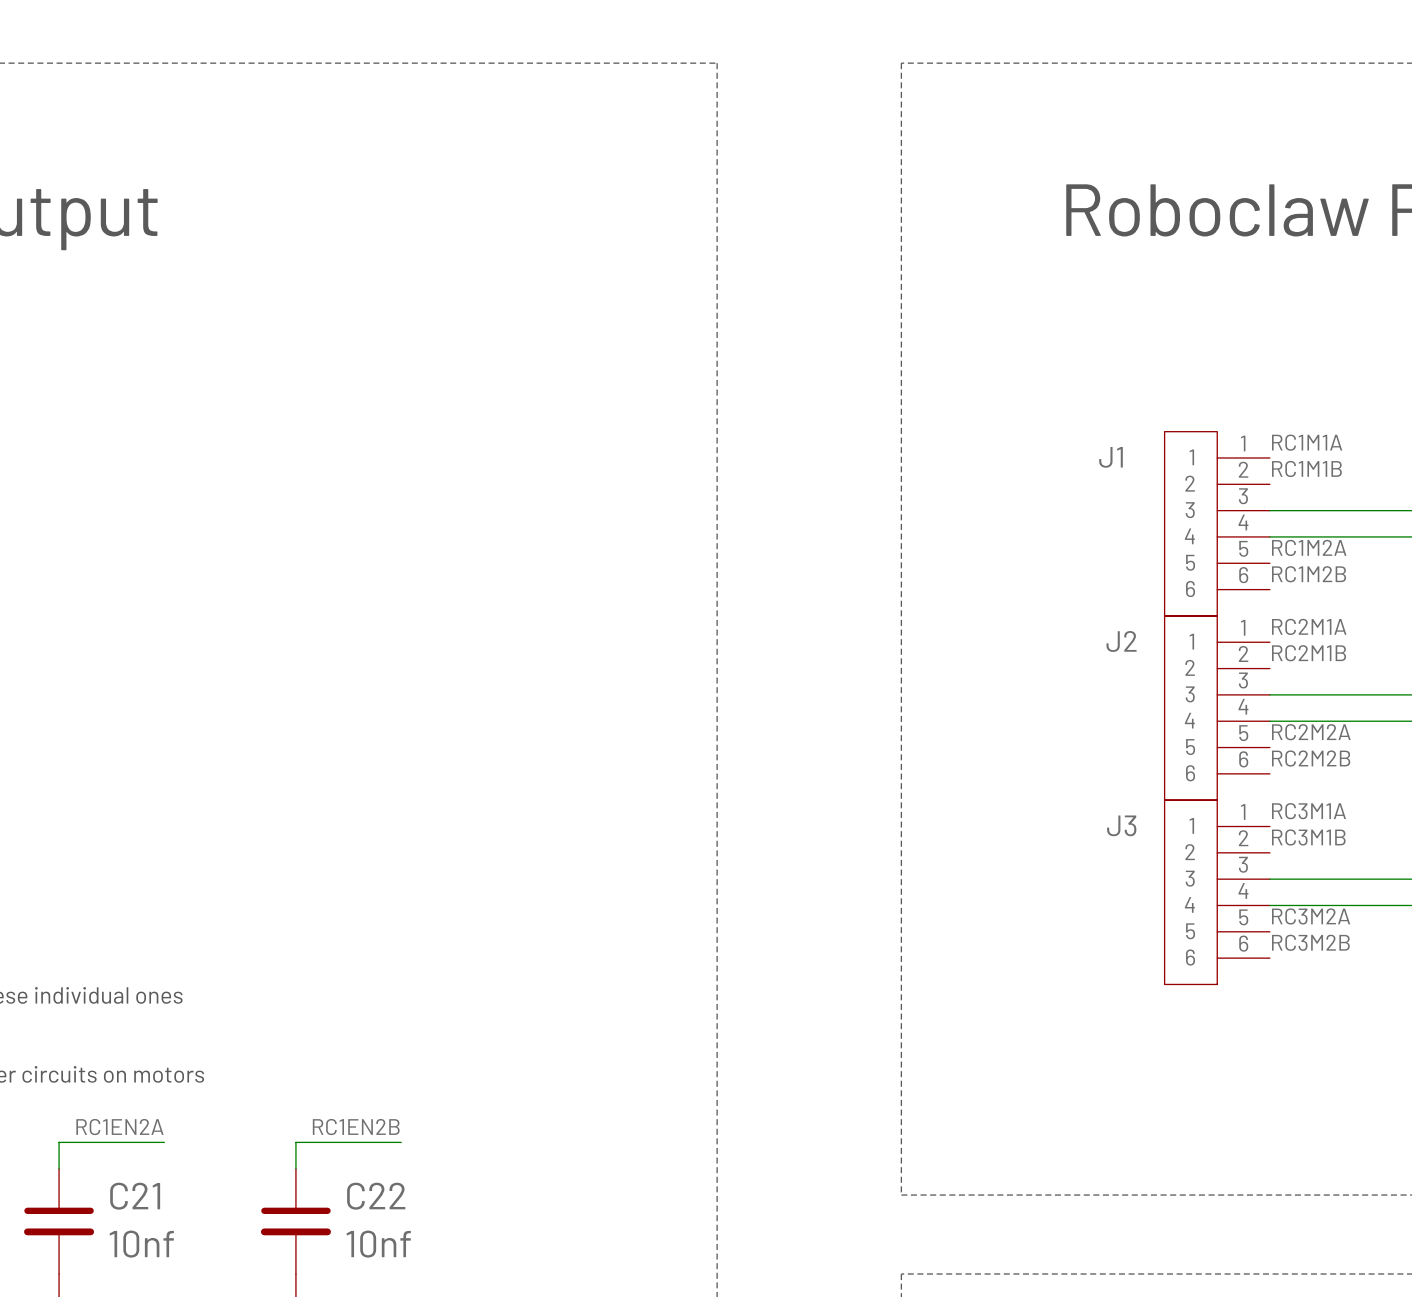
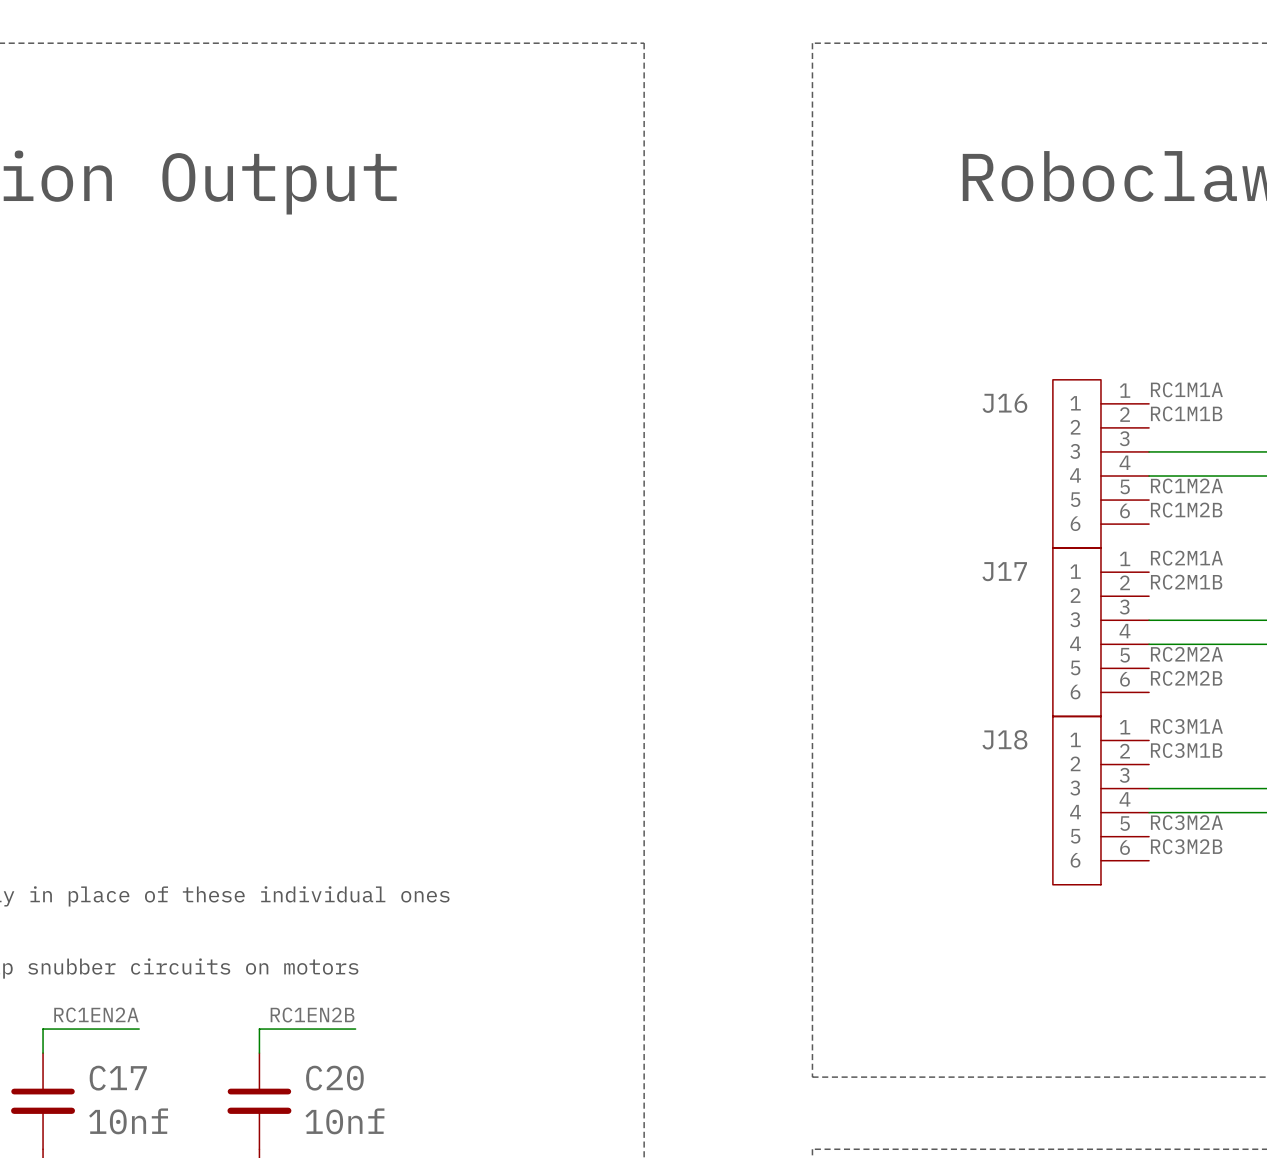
J1 name: J1 (1111, 457) -> J16 (1004, 403)
J2 name: J2 (1121, 641) -> J17 (1004, 571)
J3 name: J3 (1121, 825) -> J18 (1004, 739)
C21 name: C21 (135, 1196) -> C17 (118, 1078)
C22 name: C22 (376, 1196) -> C20 (334, 1078)

